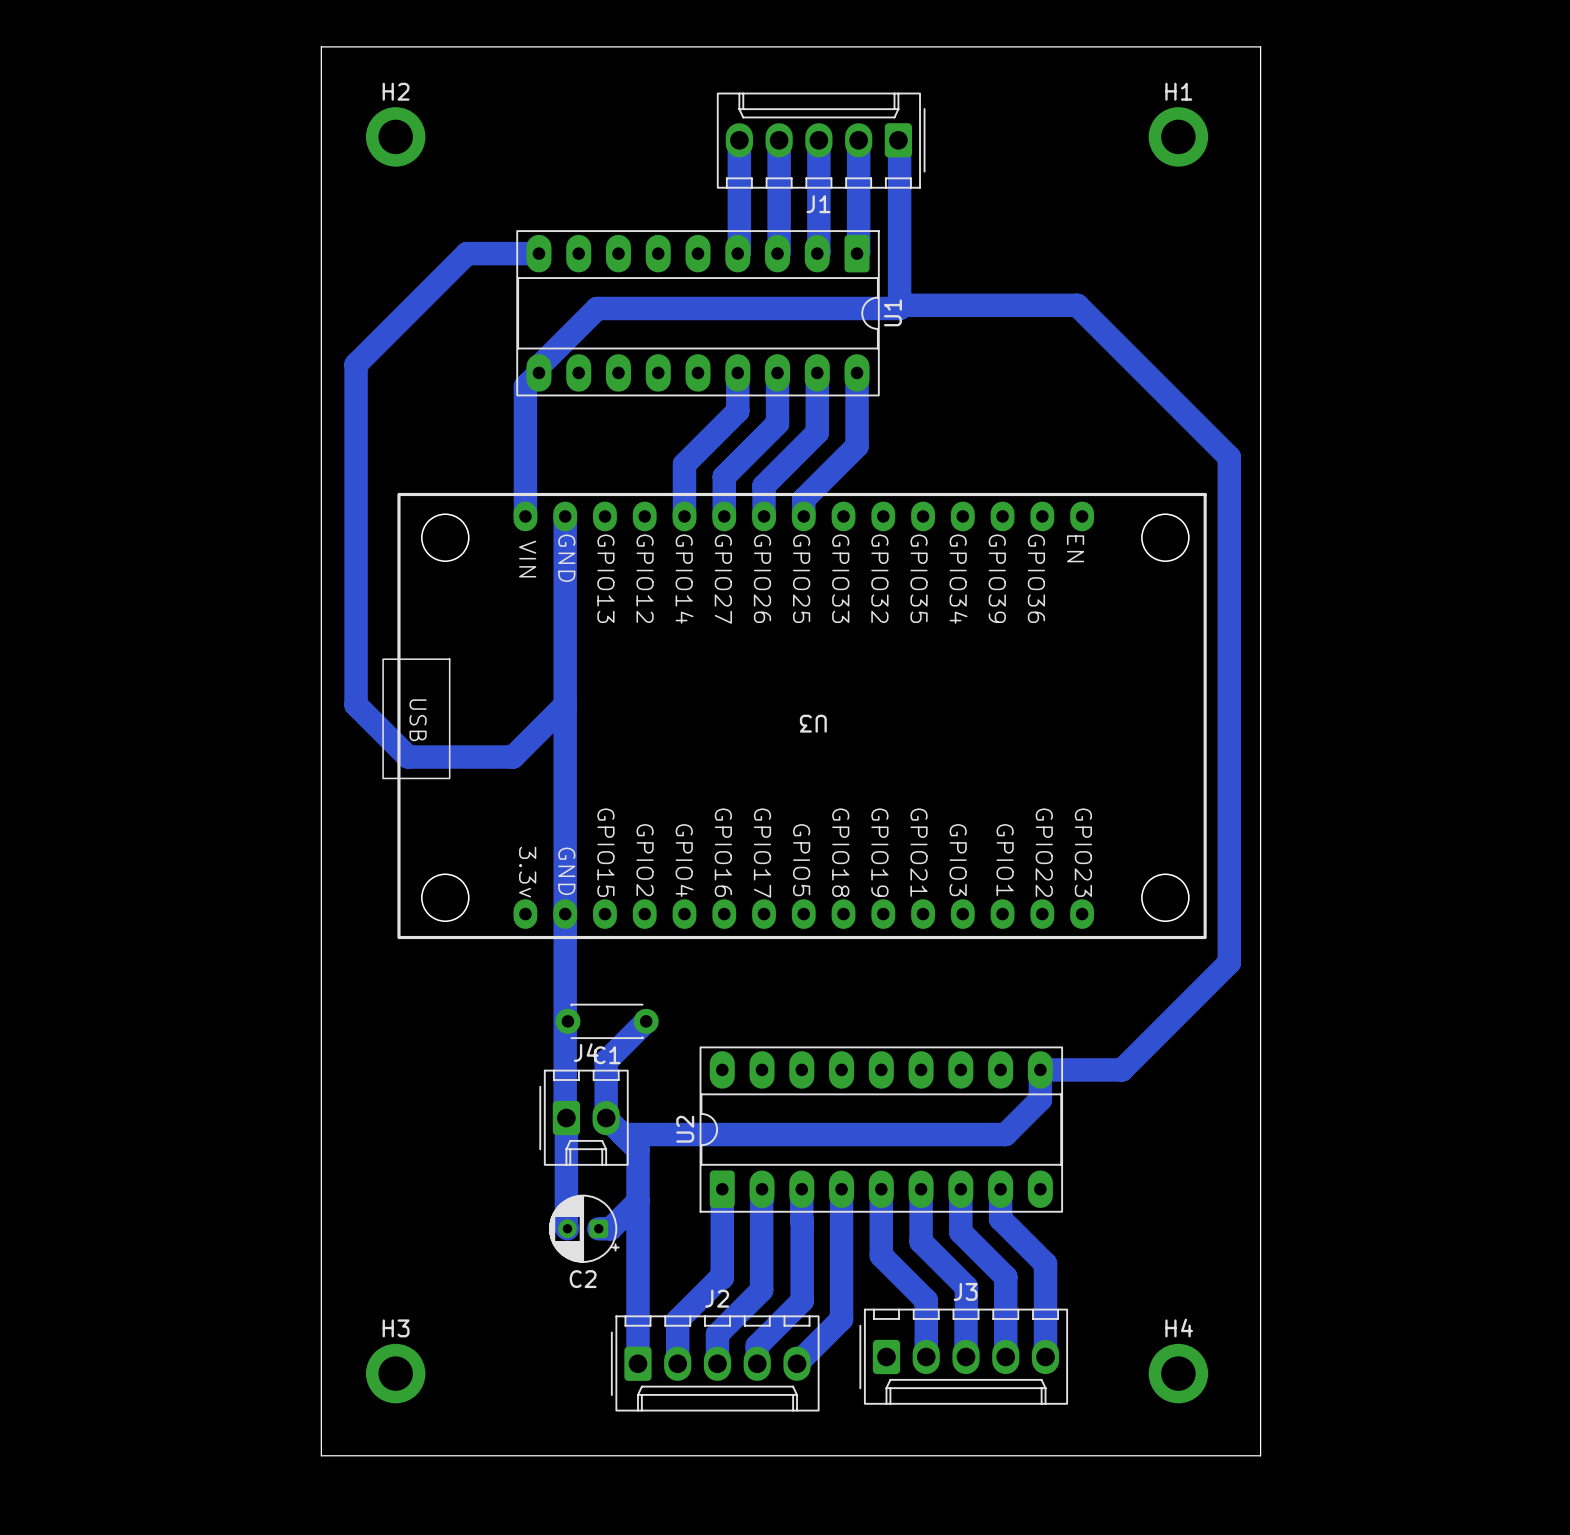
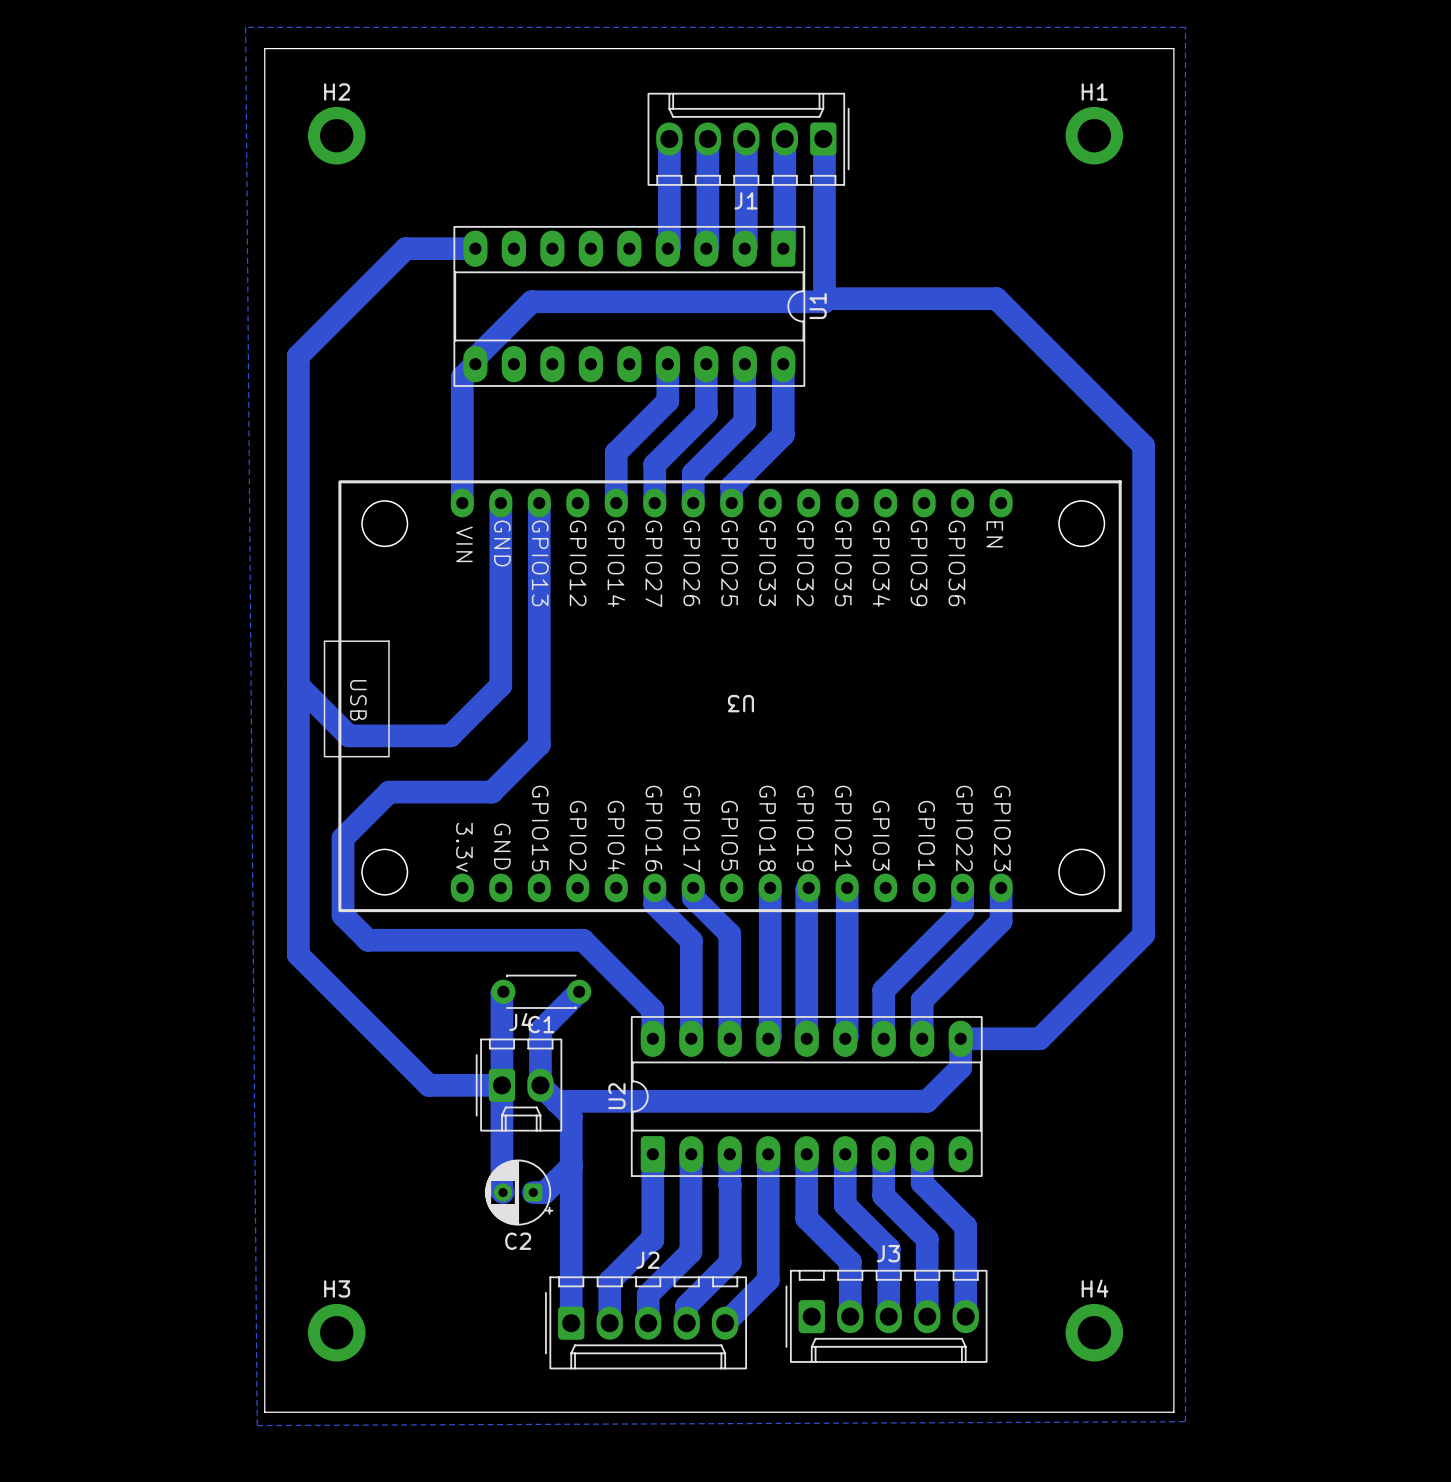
bottom zone outline: none -> (245, 27) (1185, 27) (1185, 1421) (257, 1425) (245, 27)
bottom track: none -> (539, 503) (539, 744) (491, 792) (389, 792) (343, 838) (343, 915) (368, 940) (583, 940) (652, 1009) (652, 1038)
bottom track: none -> (298, 685) (298, 954) (428, 1085) (501, 1085) (503, 991)
bottom track: (565, 704) (566, 1118) -> none
bottom track: none -> (654, 887) (654, 904) (691, 940) (691, 1038)
bottom track: none -> (693, 887) (693, 897) (729, 934) (729, 1038)
bottom track: none -> (770, 887) (770, 1036) (768, 1038)
bottom track: none -> (808, 887) (806, 889) (806, 1038)
bottom track: none -> (847, 887) (847, 1036) (845, 1038)
bottom track: none -> (962, 887) (962, 911) (883, 990) (883, 1038)
bottom track: none -> (1001, 887) (1001, 921) (922, 1000) (922, 1038)

